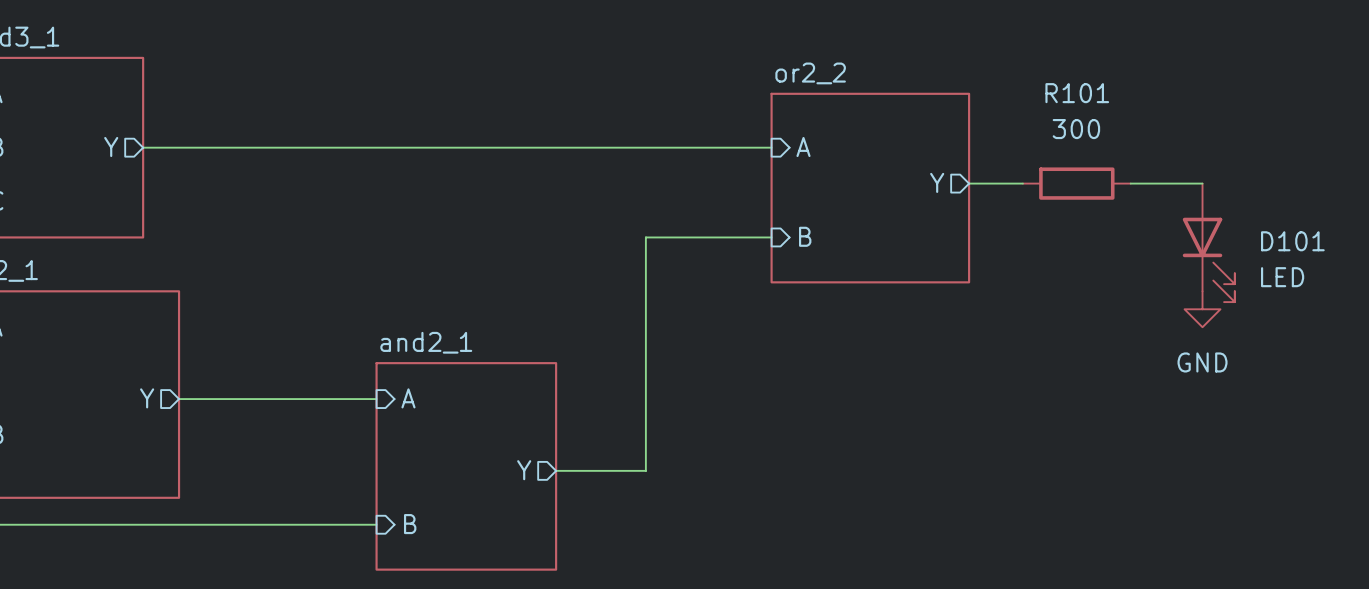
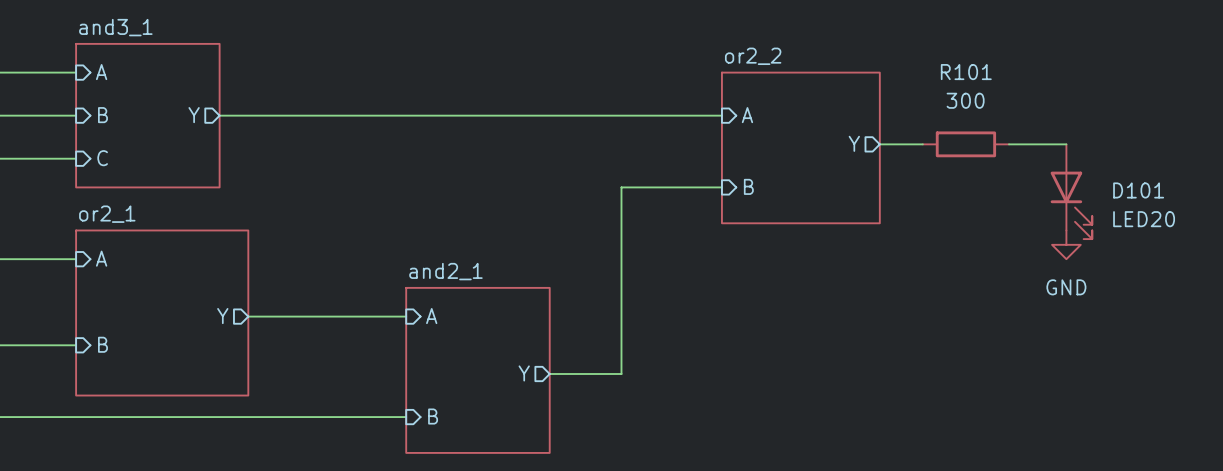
D101 value: LED (1282, 277) -> LED20 (1144, 219)

